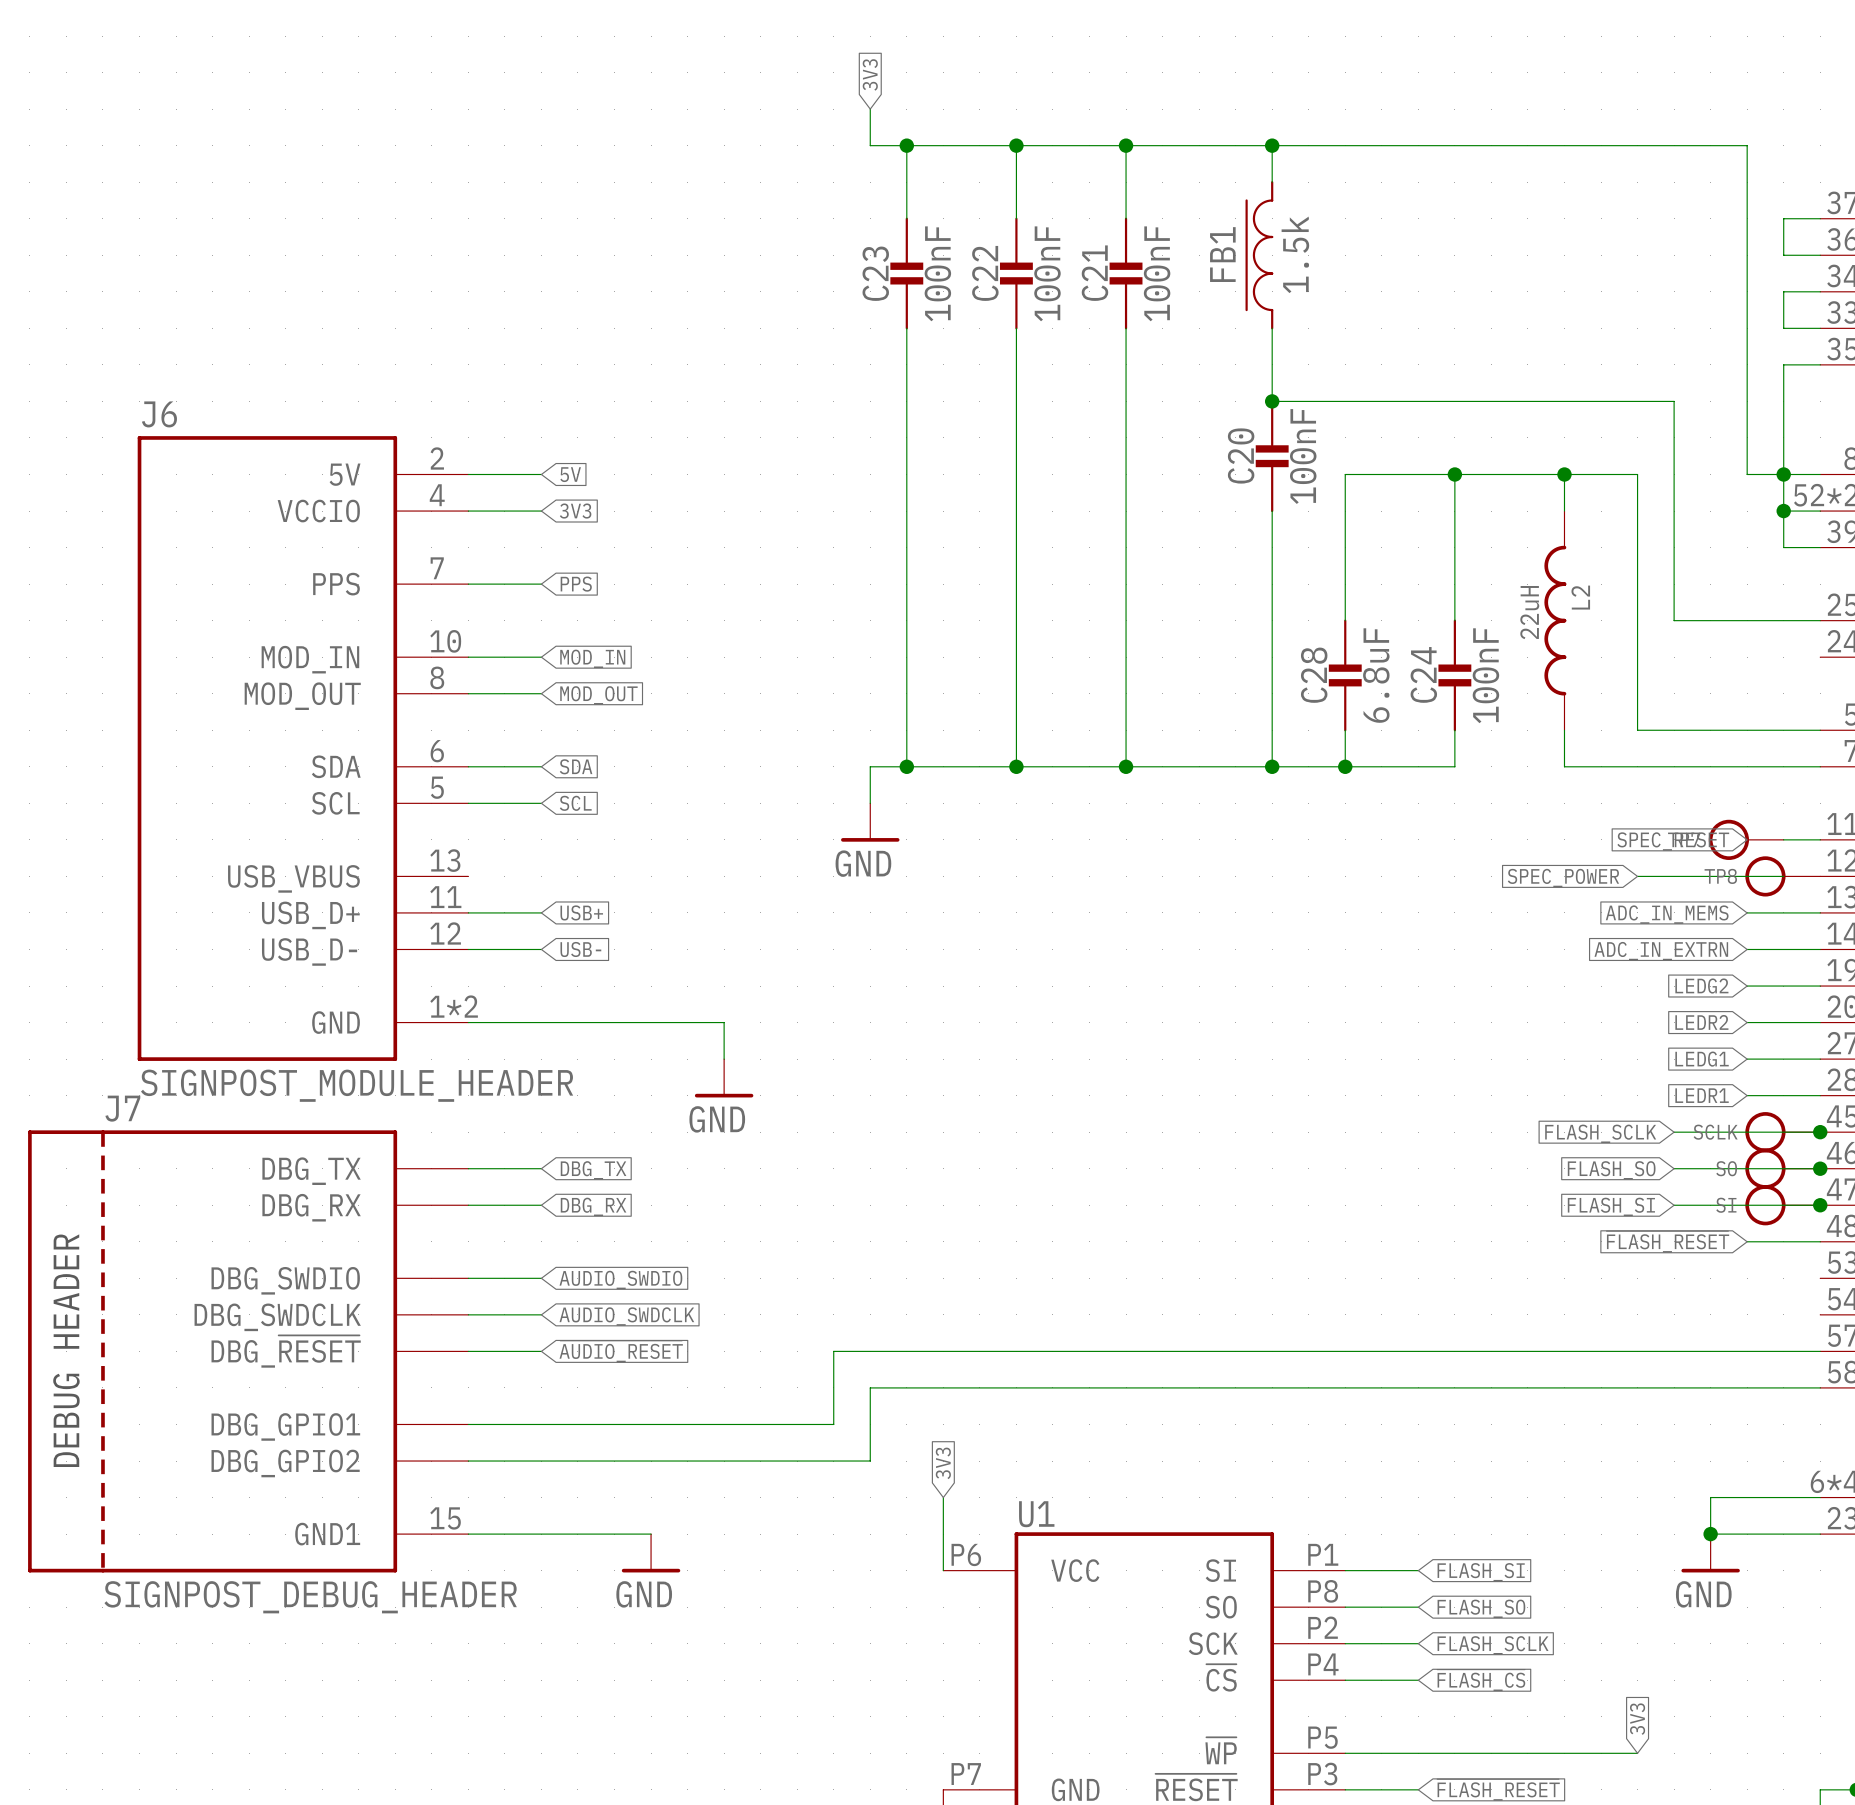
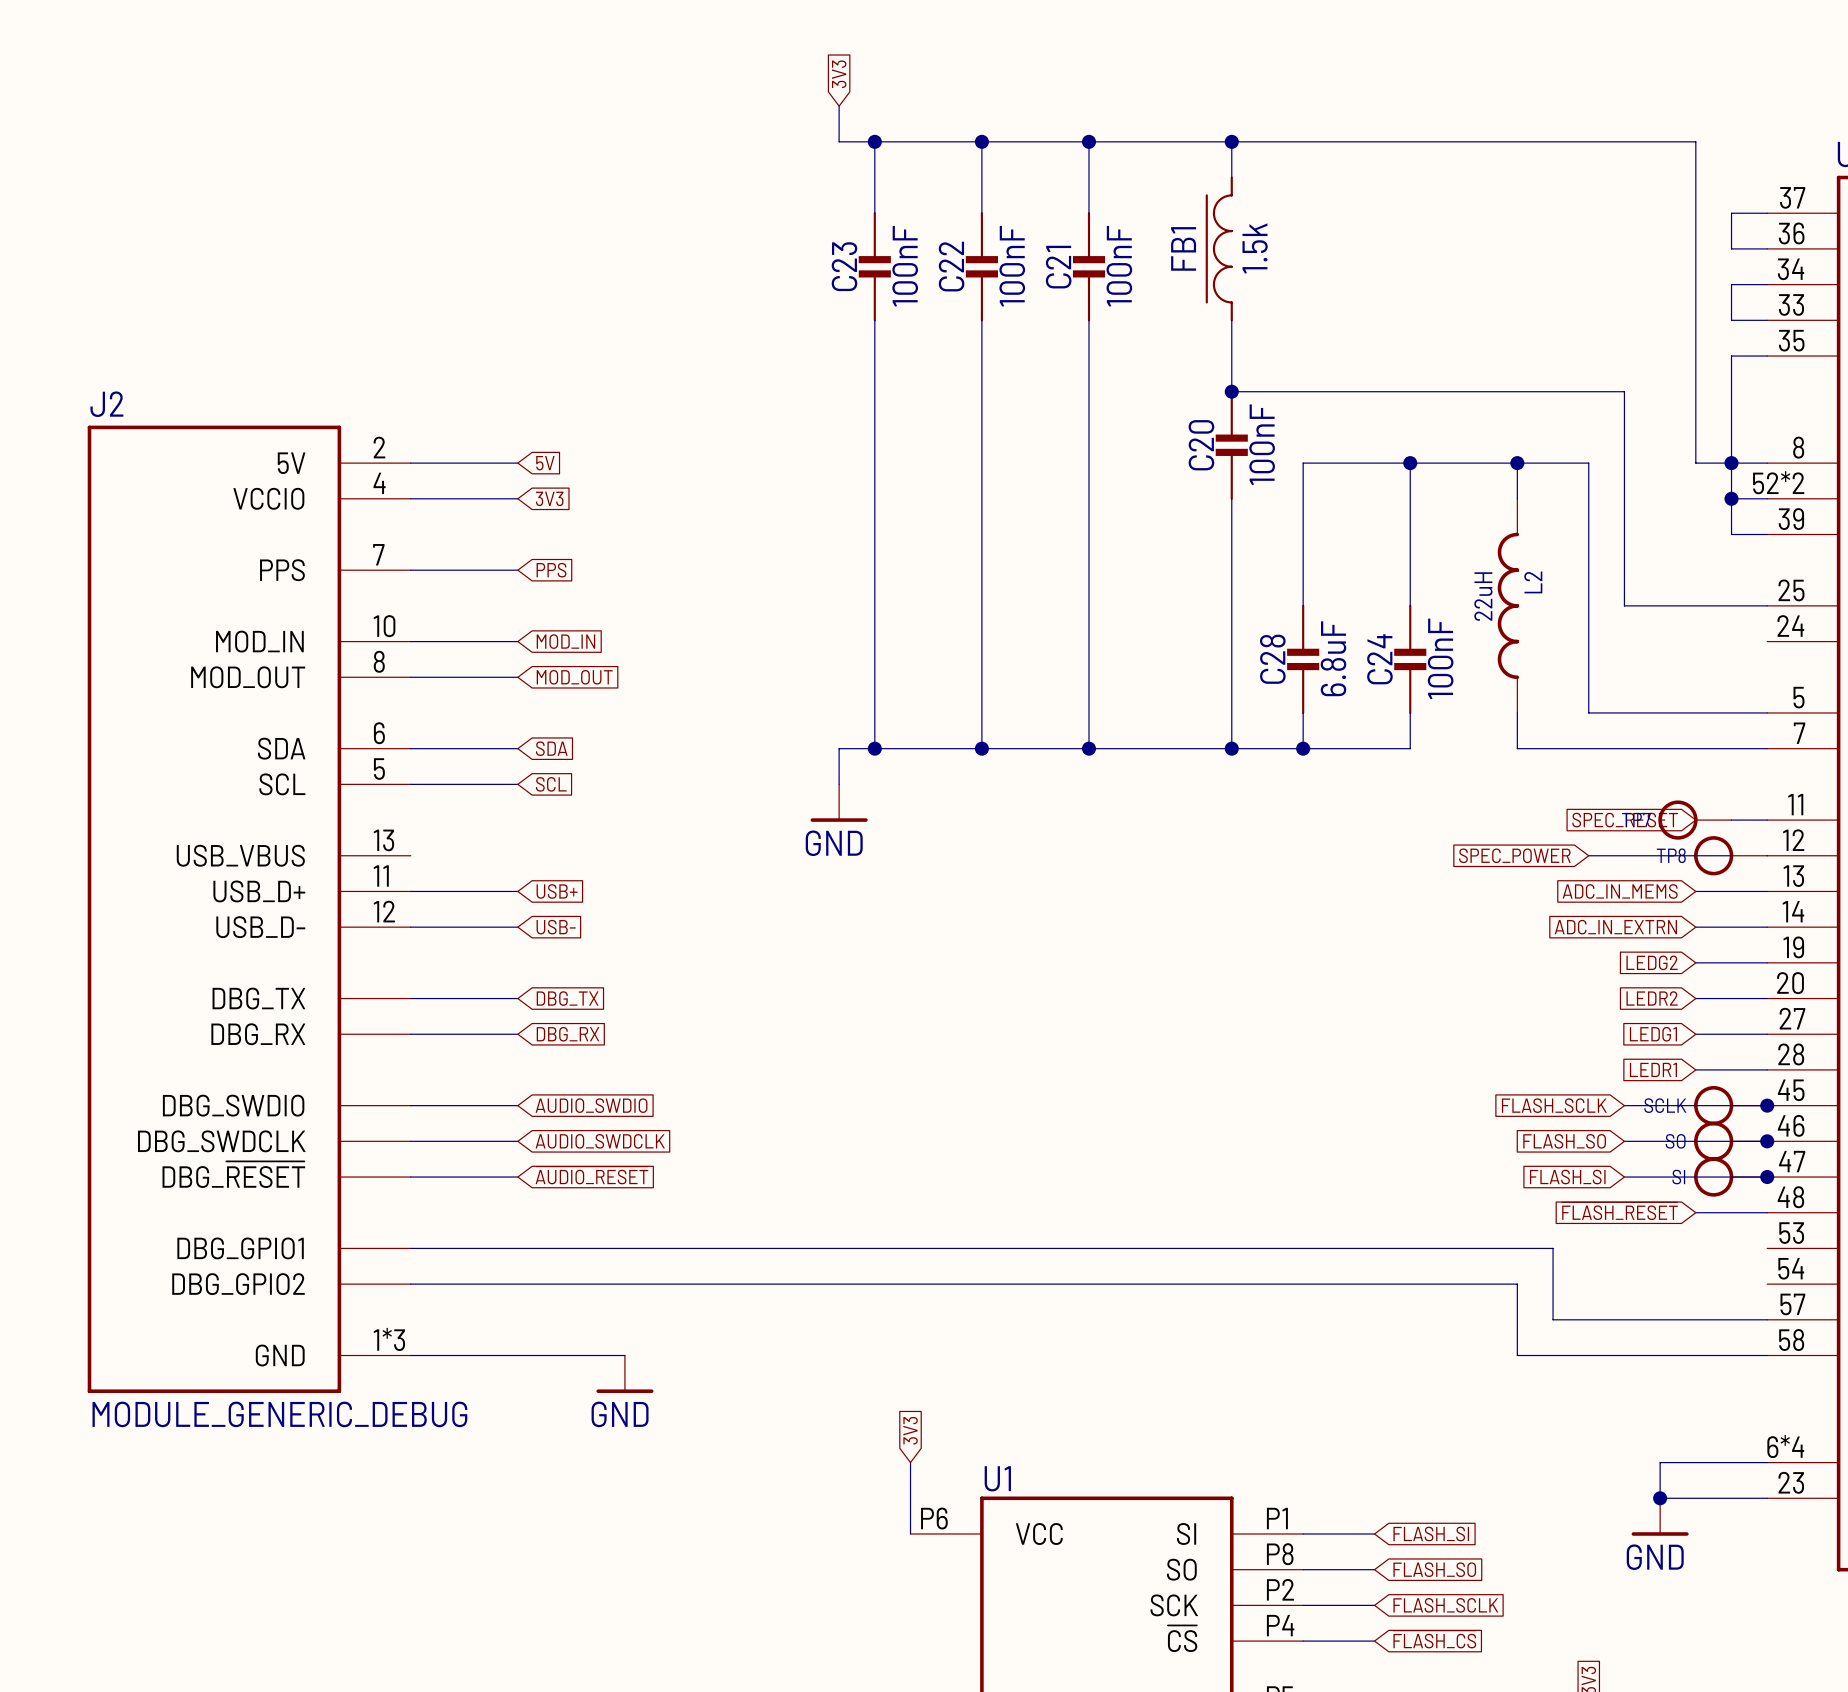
J6: SIGNPOST_MODULE_HEADER (303, 748) -> none
J2: none -> MODULE_GENERIC_DEBUG (249, 909)
wire: (541, 1022) (724, 1022) (724, 1059) -> none
global label: none -> DBG_TX (567, 998)
wire: none -> (410, 1034) (517, 1034)
global label: none -> DBG_RX (568, 1034)
power symbol: GND (724, 1078) -> none
wire: none -> (410, 1105) (517, 1105)
global label: DBG_TX (593, 1170) -> AUDIO_SWDCLK (600, 1141)
global label: DBG_RX (593, 1206) -> ~{AUDIO_RESET} (591, 1175)
global label position: AUDIO_SWDIO (620, 1279) -> AUDIO_SWDIO (591, 1105)
global label: AUDIO_SWDCLK (626, 1316) -> none
J7: SIGNPOST_DEBUG_HEADER (248, 1351) -> none
wire: (468, 1351) (541, 1351) -> none
global label: ~{AUDIO_RESET} (621, 1351) -> none
wire: (1601, 1351) (833, 1351) (833, 1424) (468, 1424) -> (1553, 1319) (1553, 1248) (517, 1248)
wire: none -> (410, 1355) (624, 1355)
wire: (1564, 1387) (870, 1387) (870, 1461) (468, 1461) -> (1517, 1355) (1517, 1284) (517, 1284)
wire: (468, 1534) (651, 1534) -> none
power symbol position: GND (651, 1553) -> GND (624, 1374)

